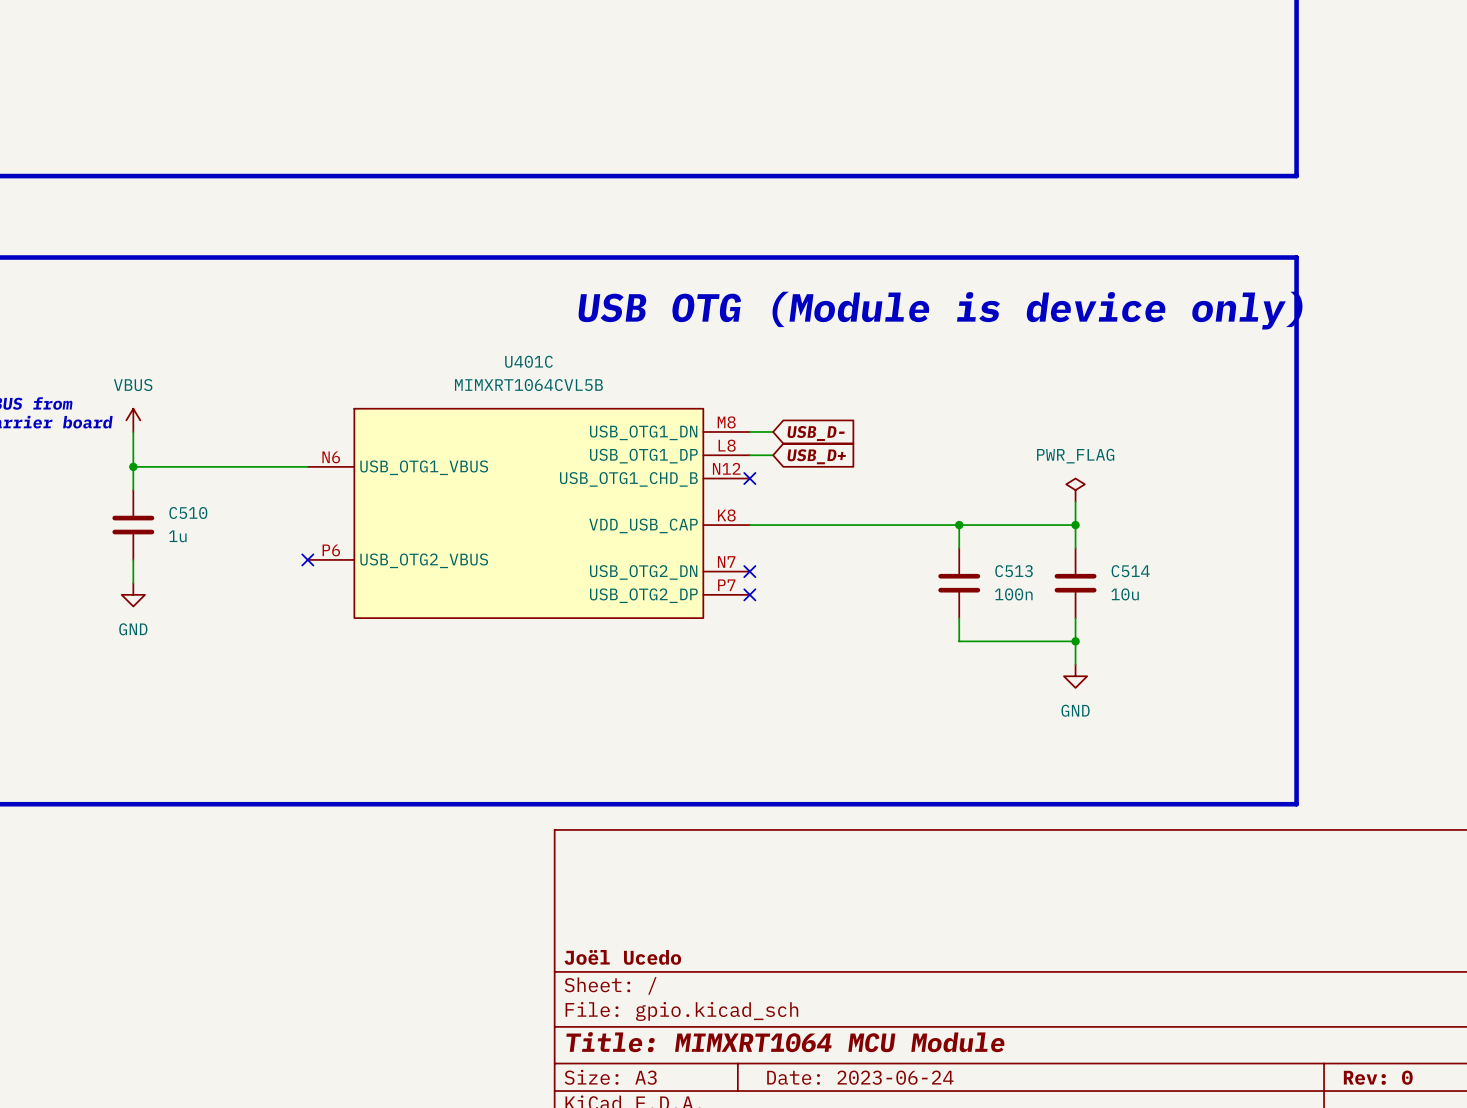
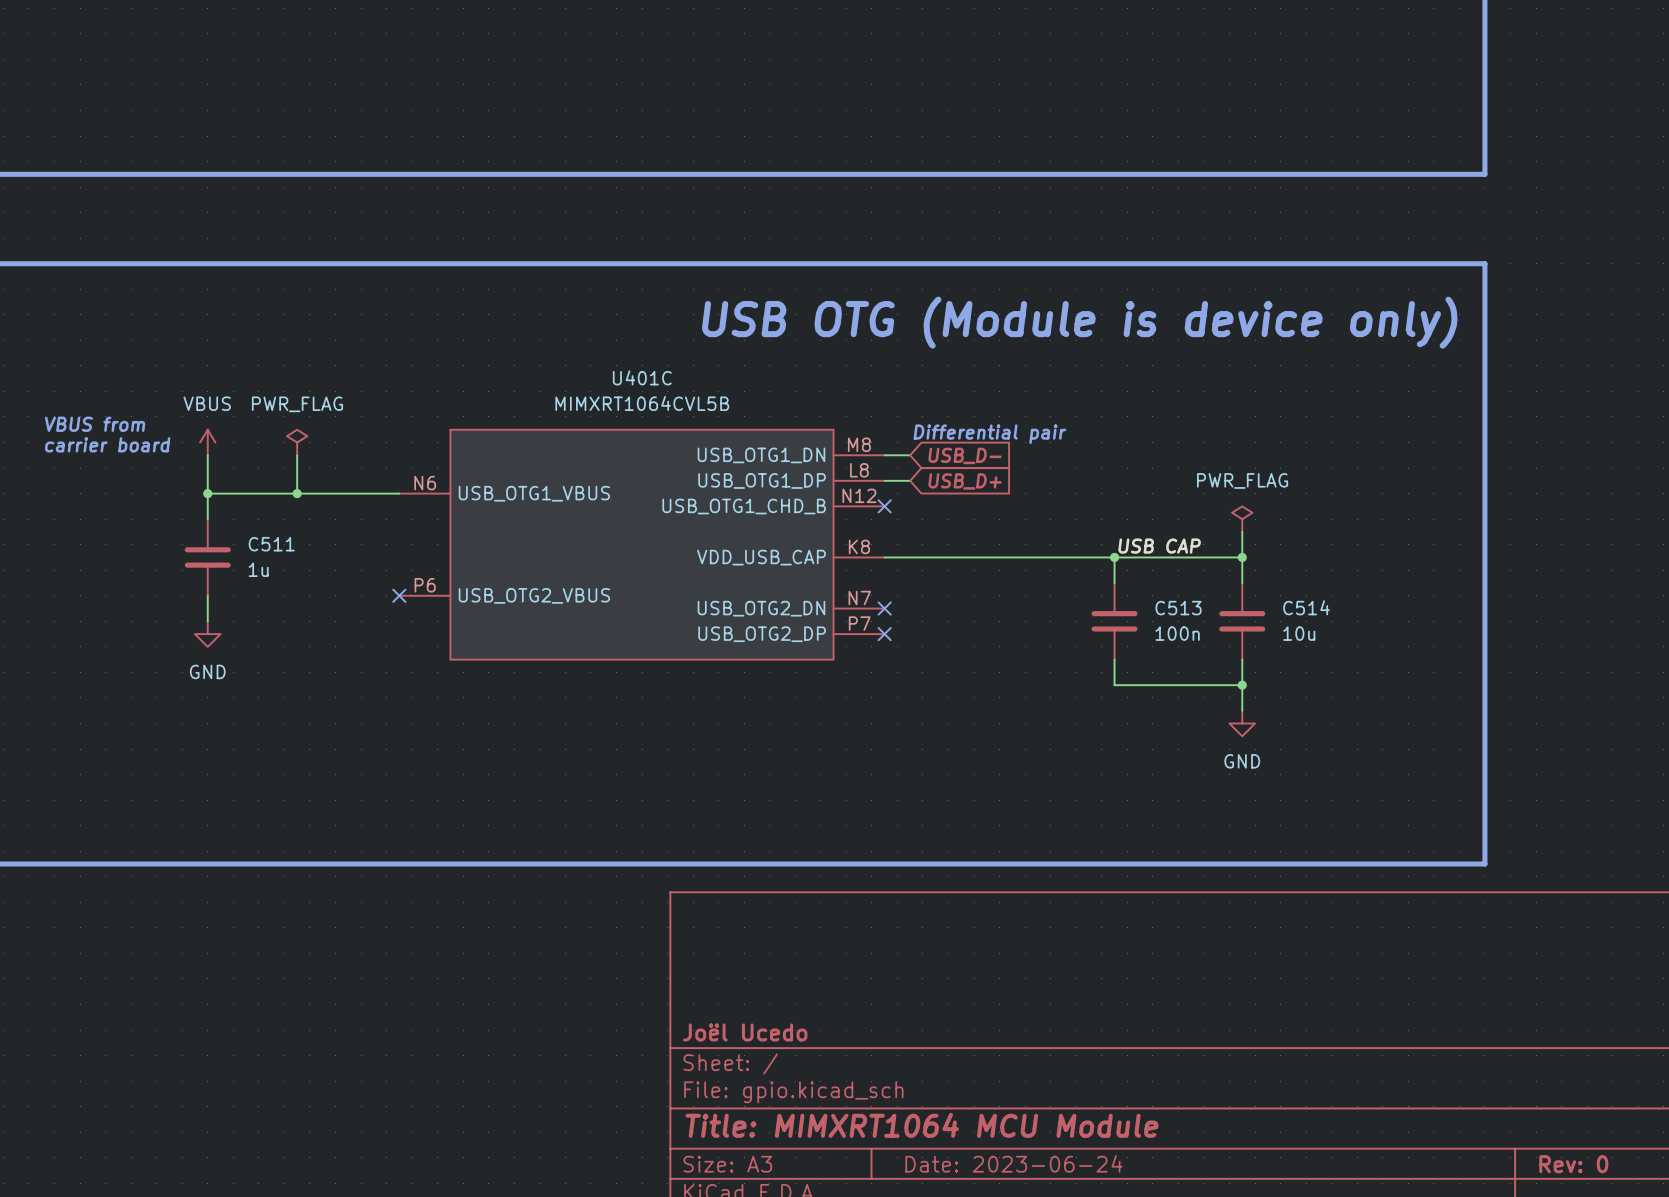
text: none -> Differential pair (989, 434)
power symbol: none -> PWR_FLAG (297, 442)
wire: none -> (297, 455) (297, 493)
junction: none -> (297, 493)
C510 name: C510 (188, 512) -> C511 (271, 544)
label: none -> USB CAP (1159, 546)

